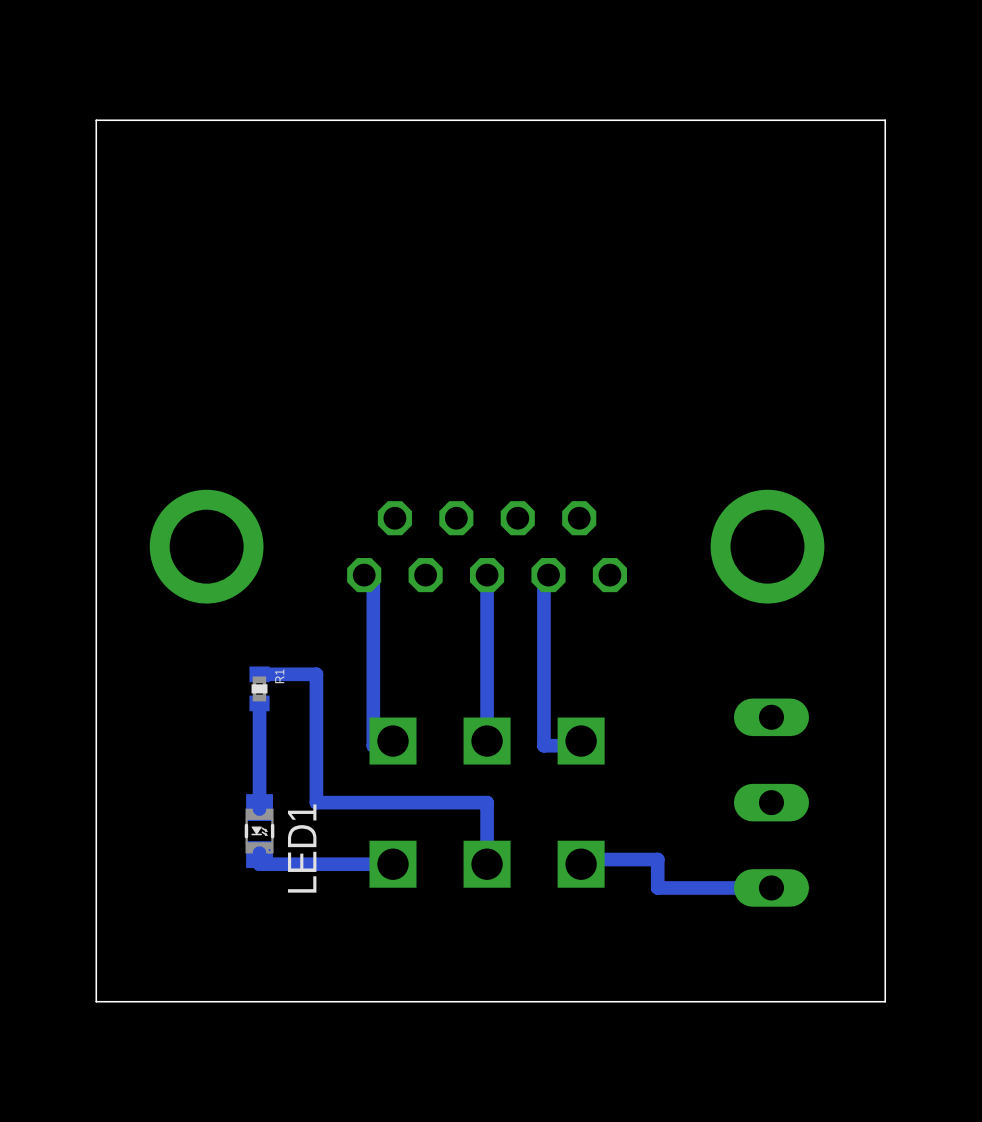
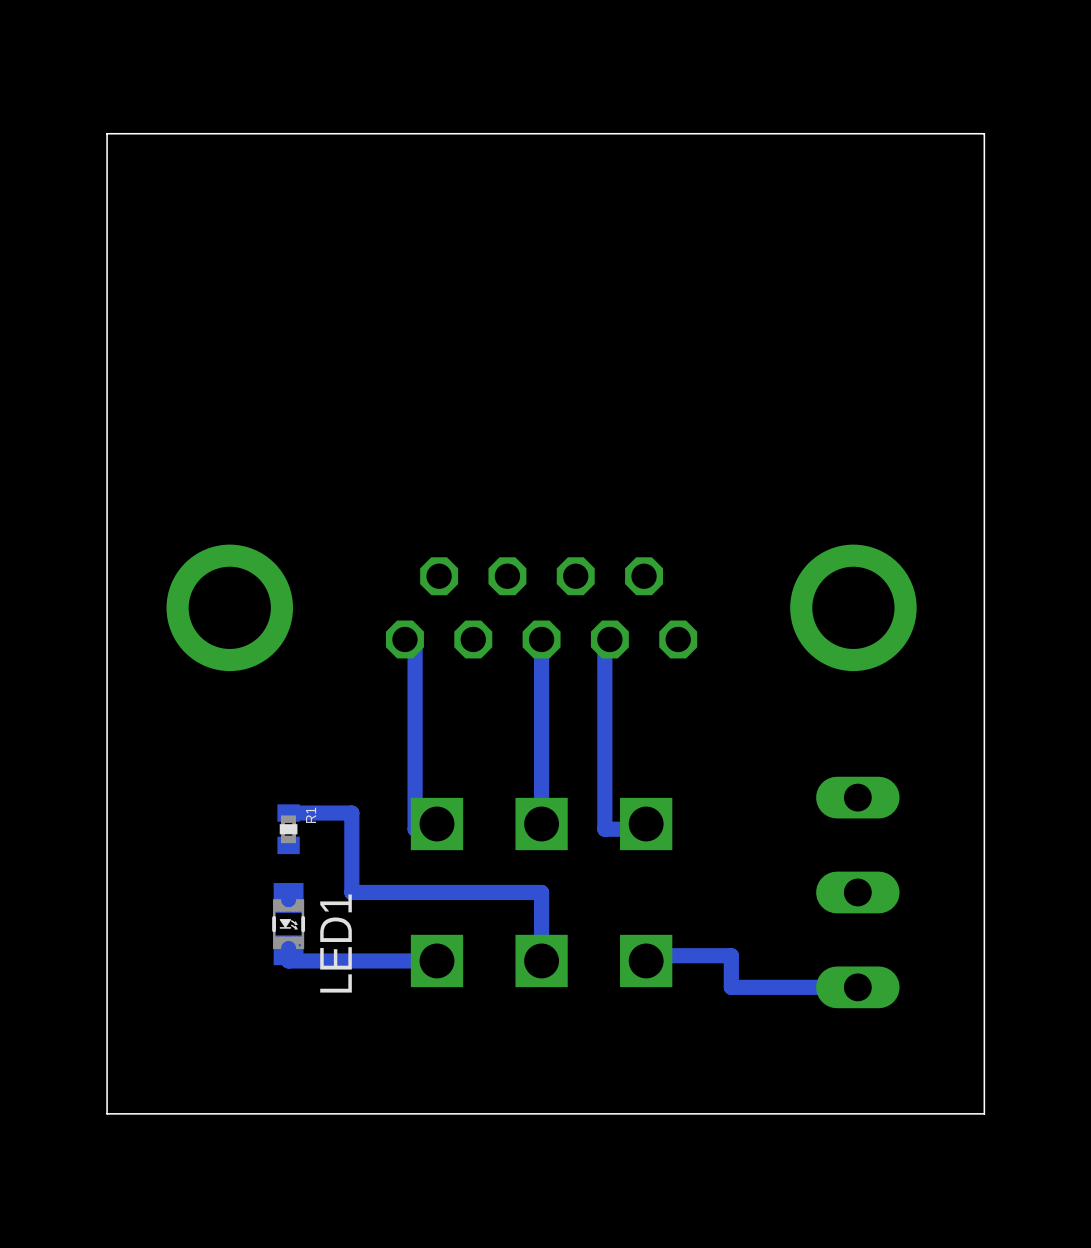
bottom track: (259, 674) (316, 674) (316, 731) -> (288, 813) (351, 813)
R1 position: (259, 688) -> (288, 829)
bottom track: (259, 703) (259, 807) -> none

